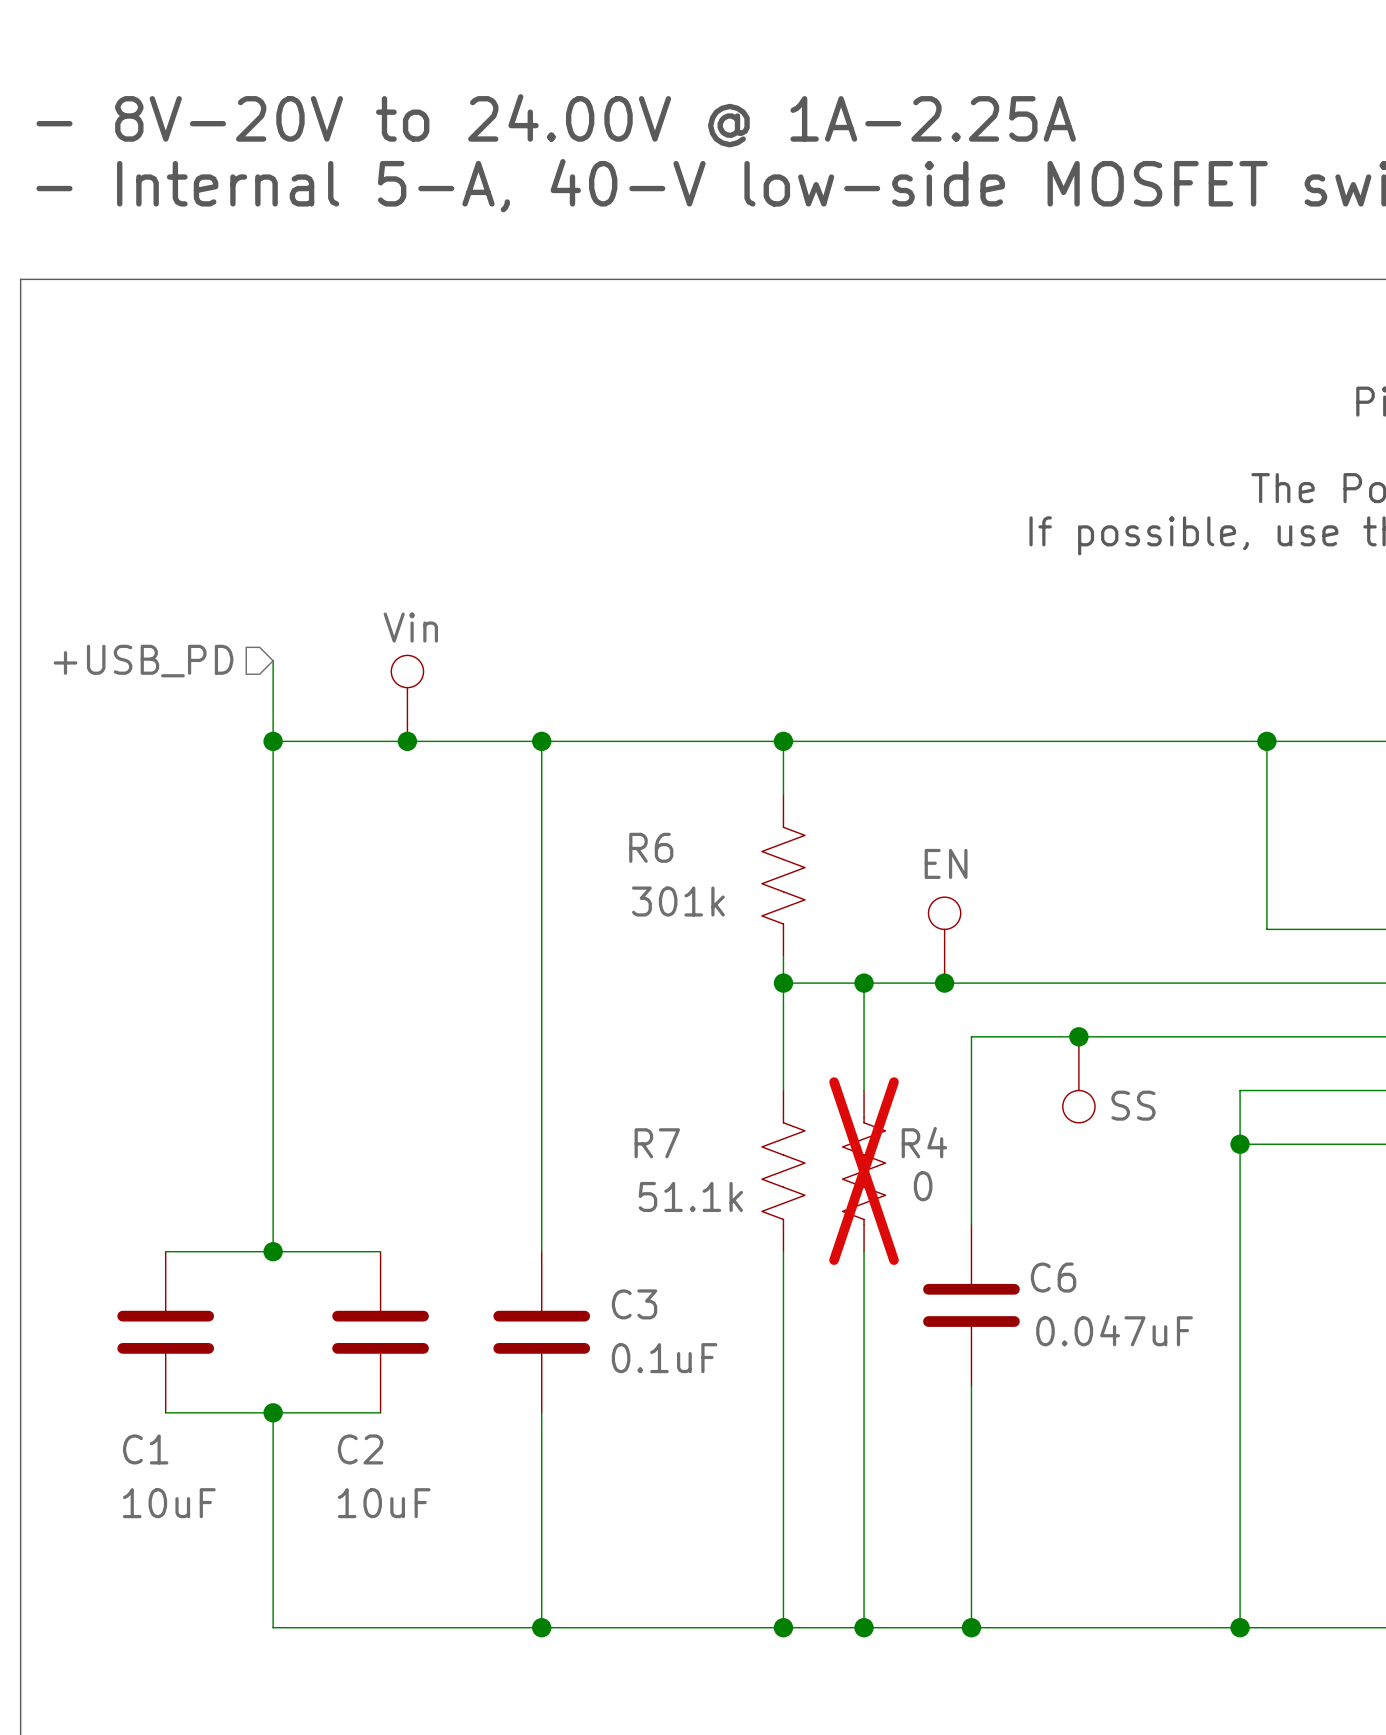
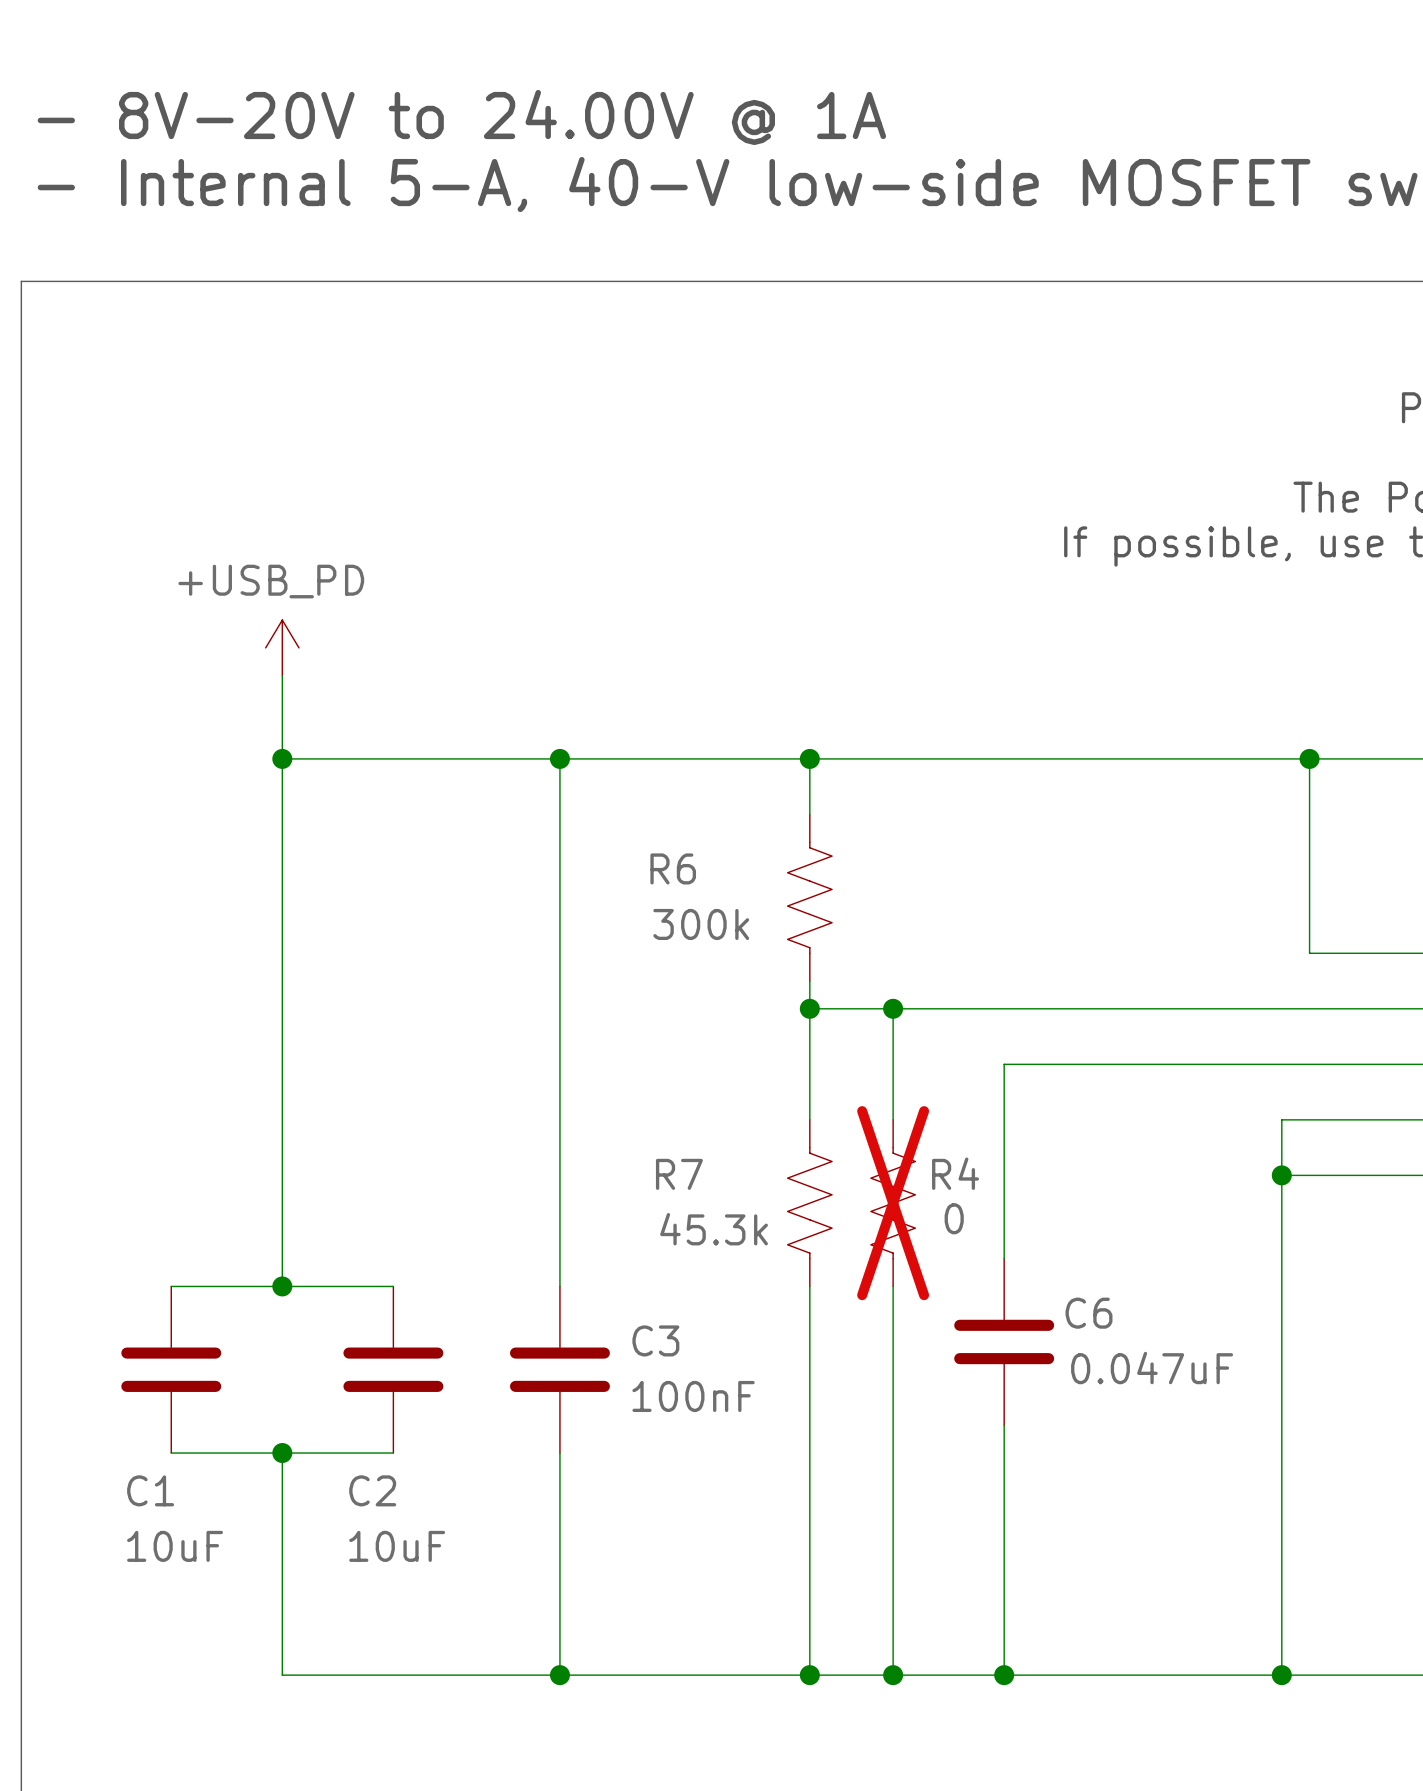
text: - 8V-20V to 24.00V @ 1A-2.25A (556, 120) -> - 8V-20V to 24.00V @ 1A (461, 117)
power symbol: none -> +USB_PD (282, 647)
hierarchical label: +USB_PD (143, 661) -> none
part: Vin (407, 698) -> none
junction: (407, 741) -> none
R6 value: 301k (678, 901) -> 300k (701, 924)
part: EN (944, 940) -> none
junction: (944, 983) -> none
junction: (1078, 1036) -> none
part: SS (1078, 1079) -> none
R7 value: 51.1k (690, 1196) -> 45.3k (714, 1229)
C3 value: 0.1uF (664, 1358) -> 100nF (693, 1396)

